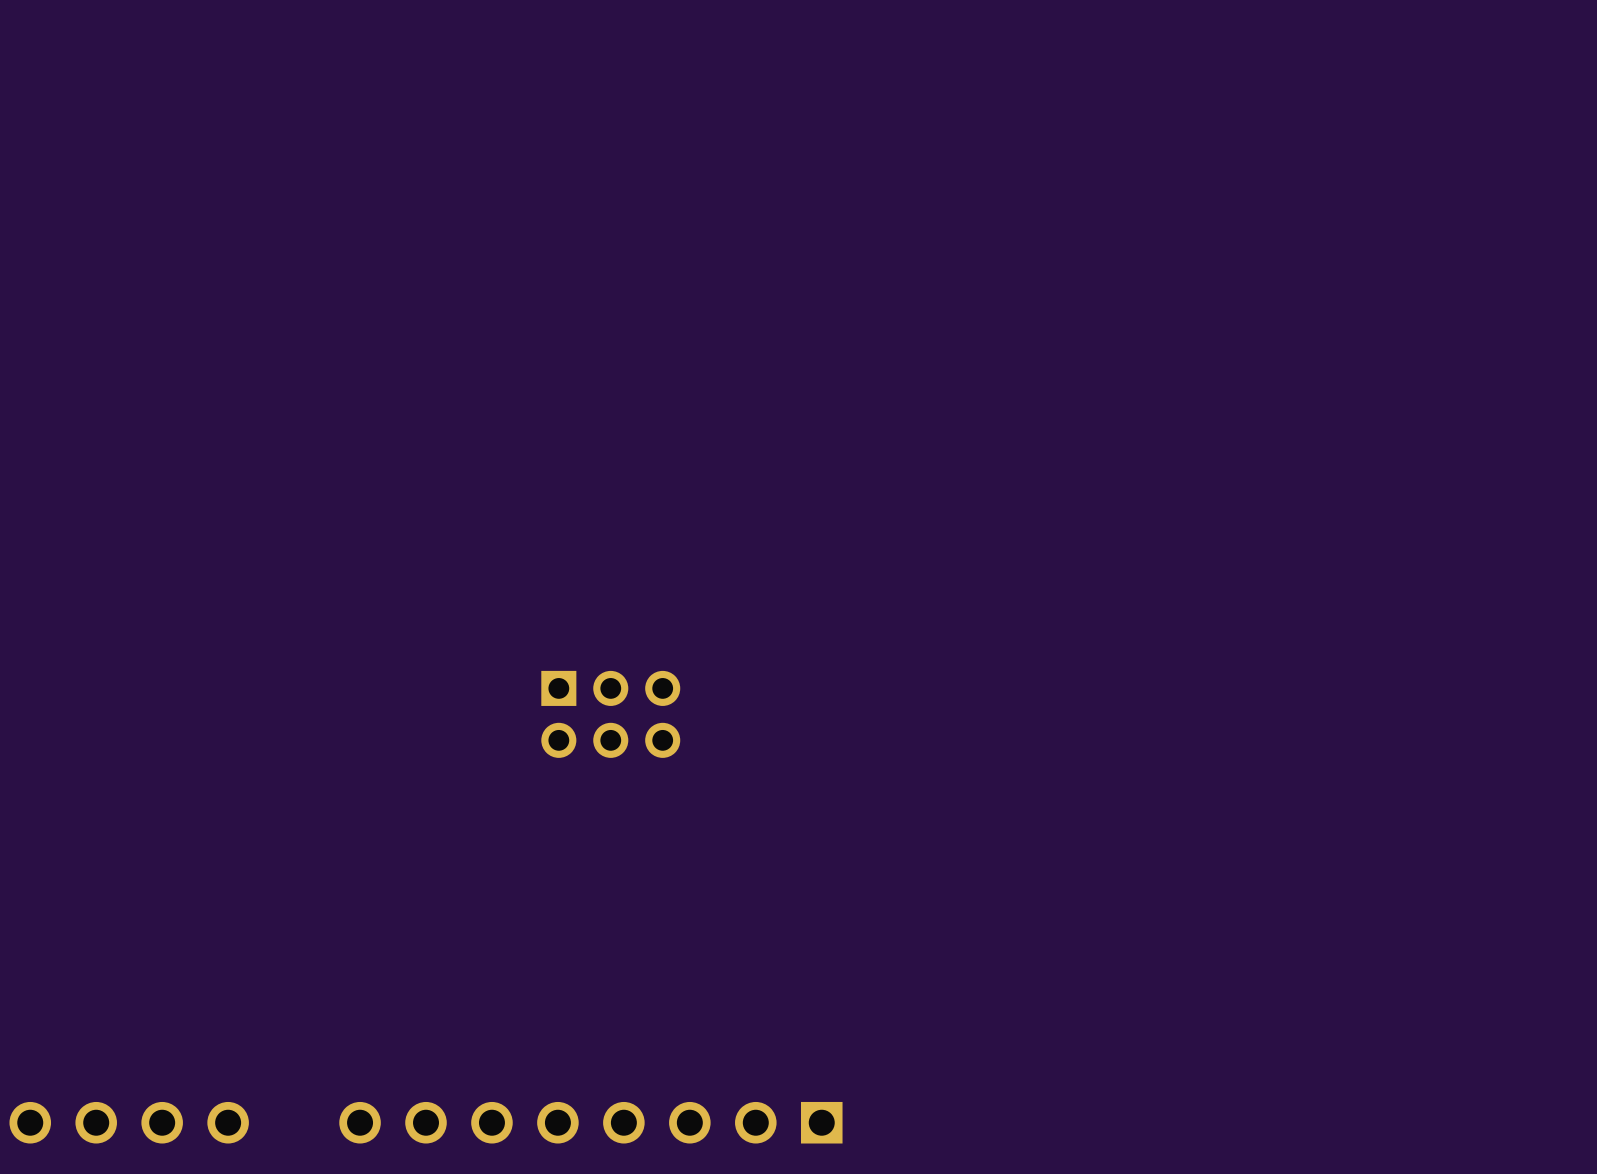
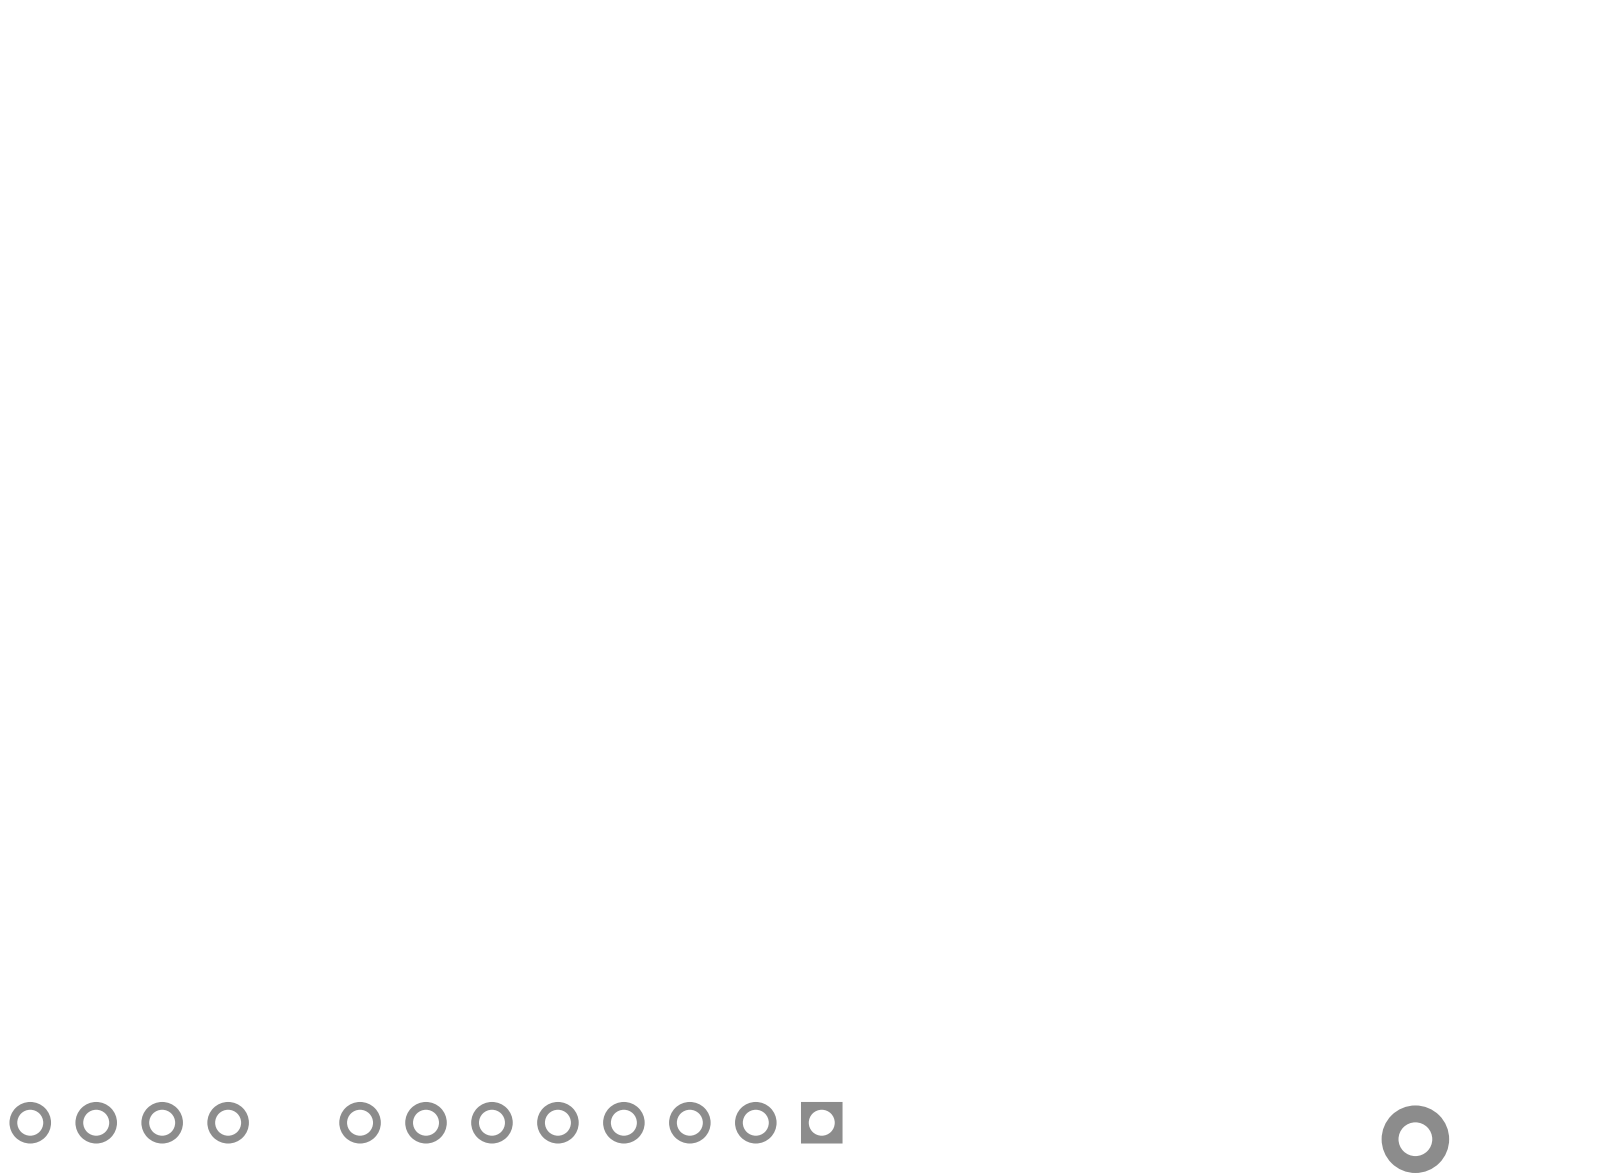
part: (610, 714) -> none
part: none -> (1415, 1139)

